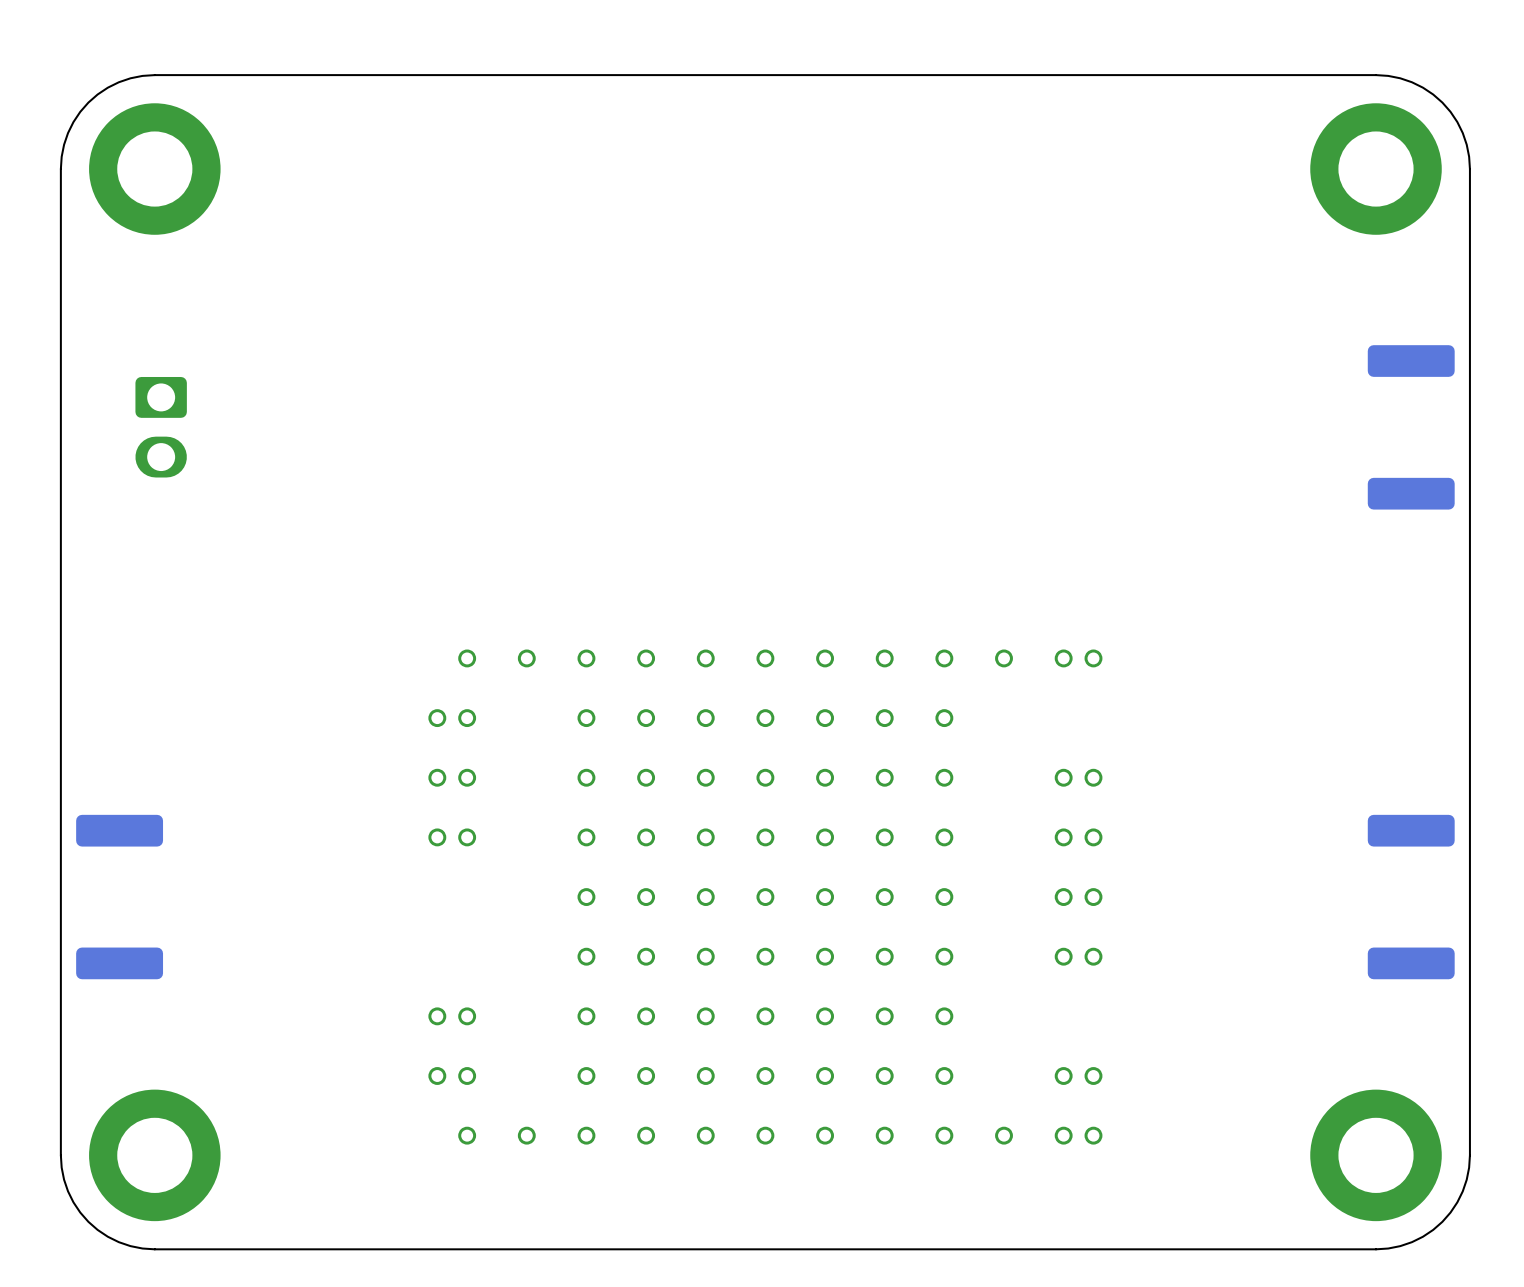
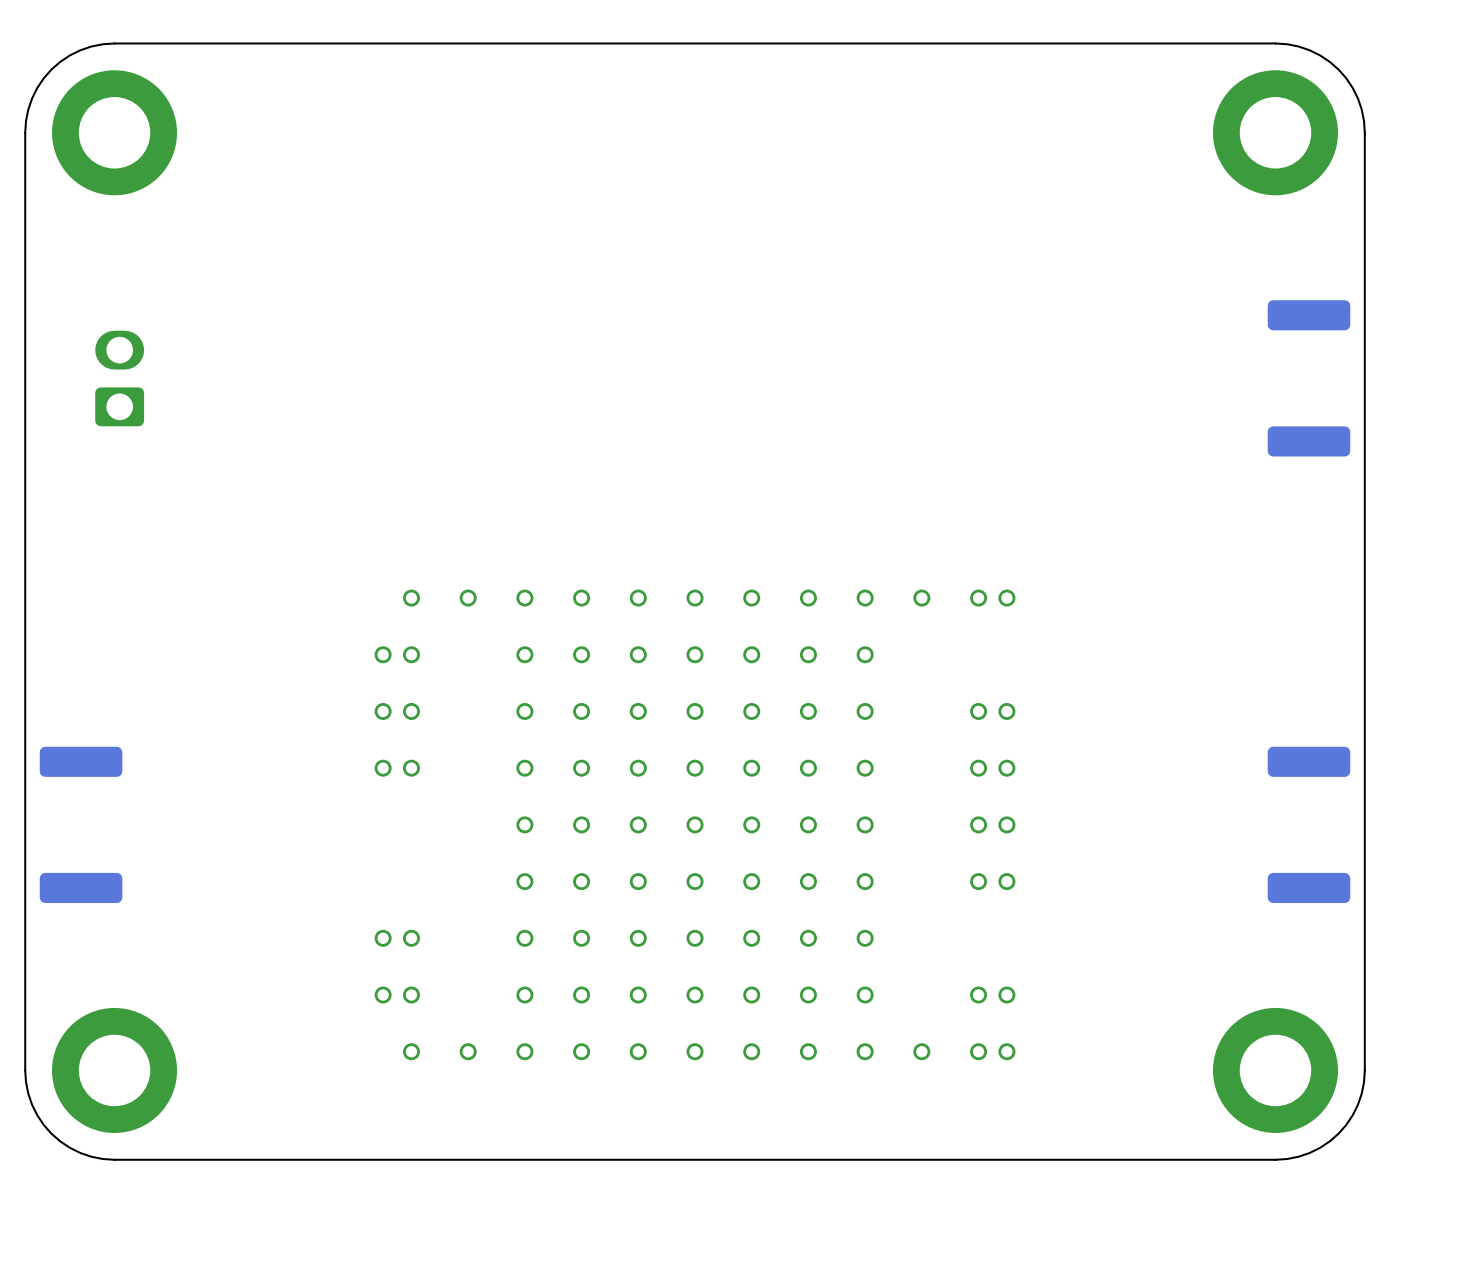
part rotation: 0° (161, 427) -> 180° (119, 378)

